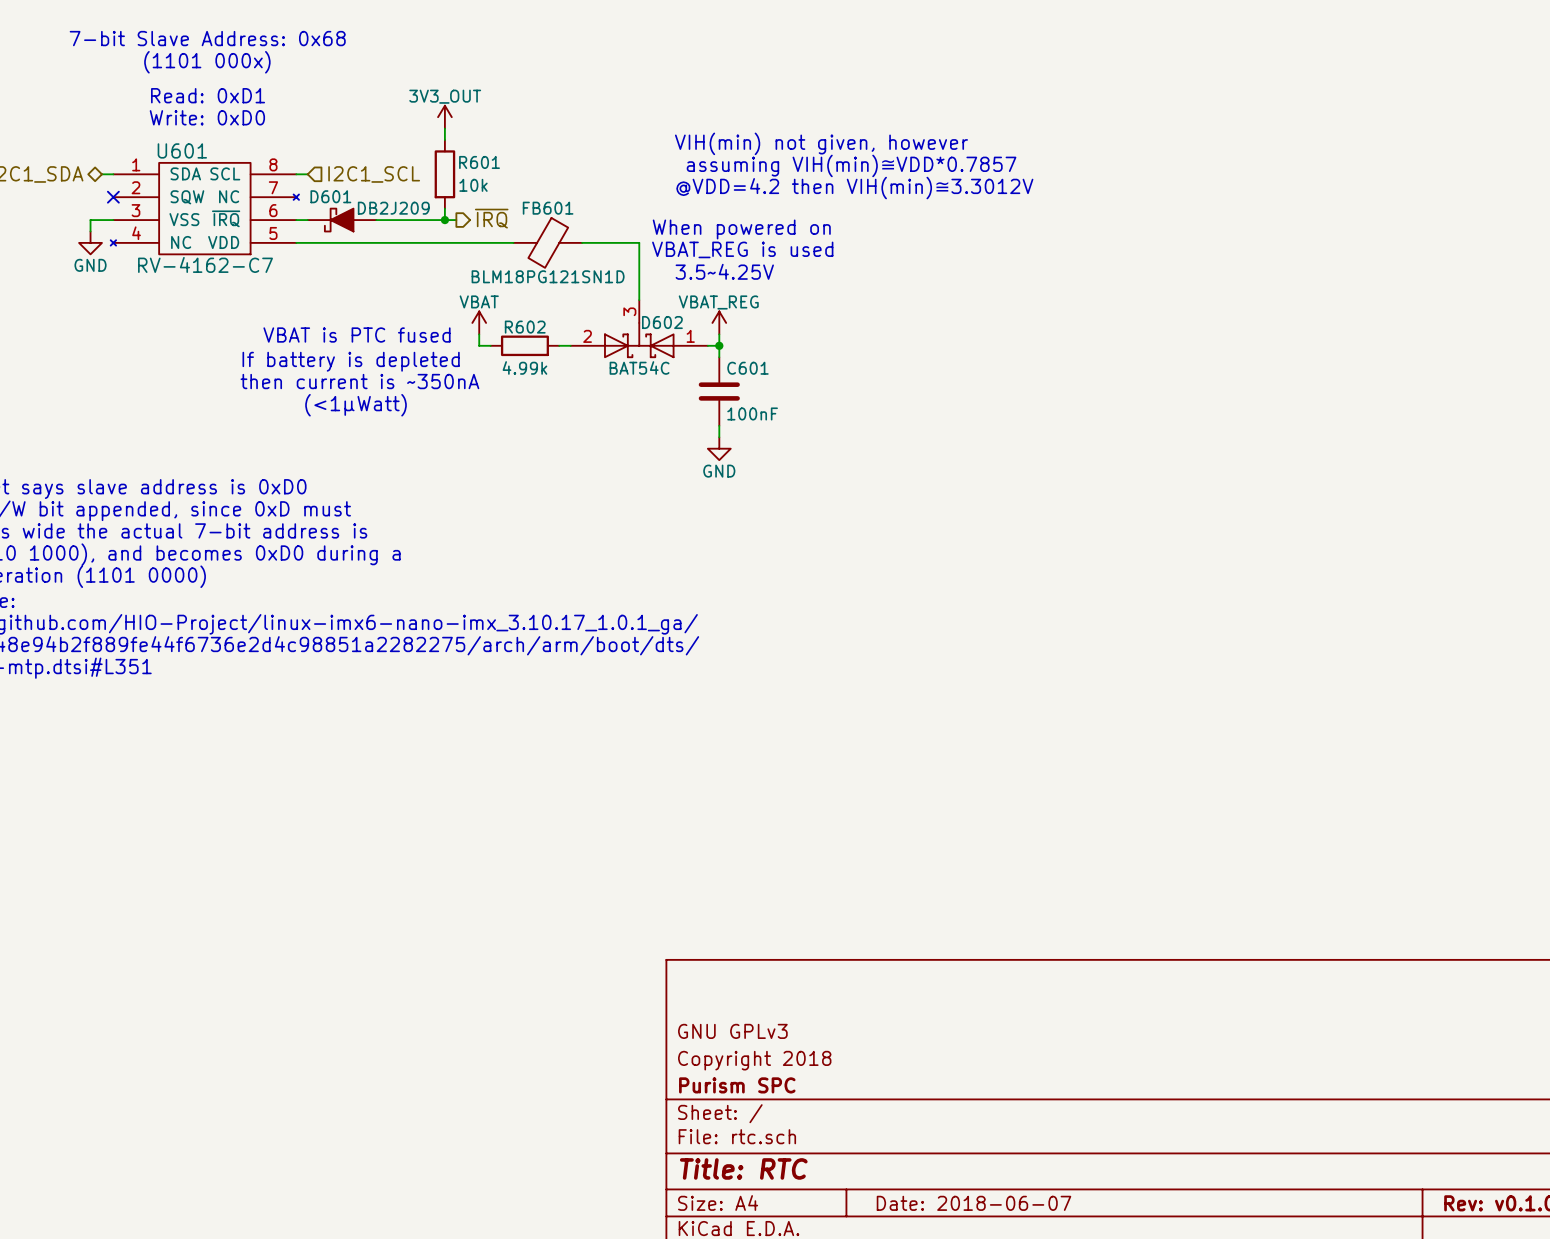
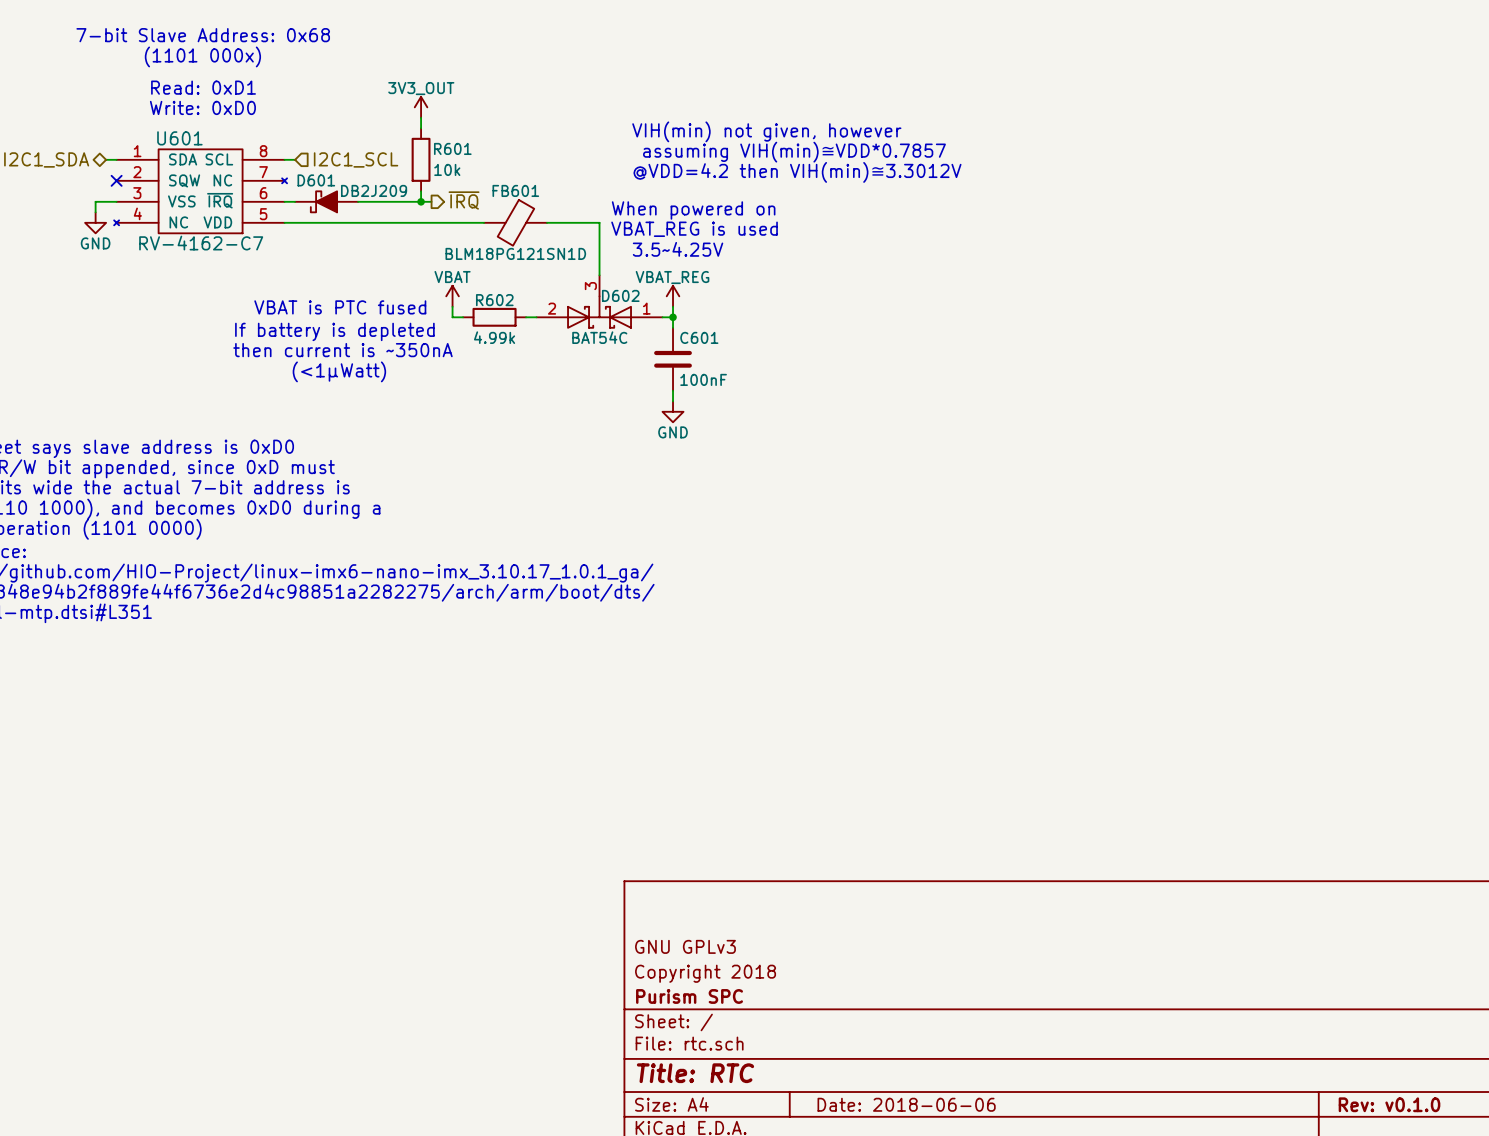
title block: Date: 2018-06-07 (974, 1203) -> Date: 2018-06-06 (906, 1104)

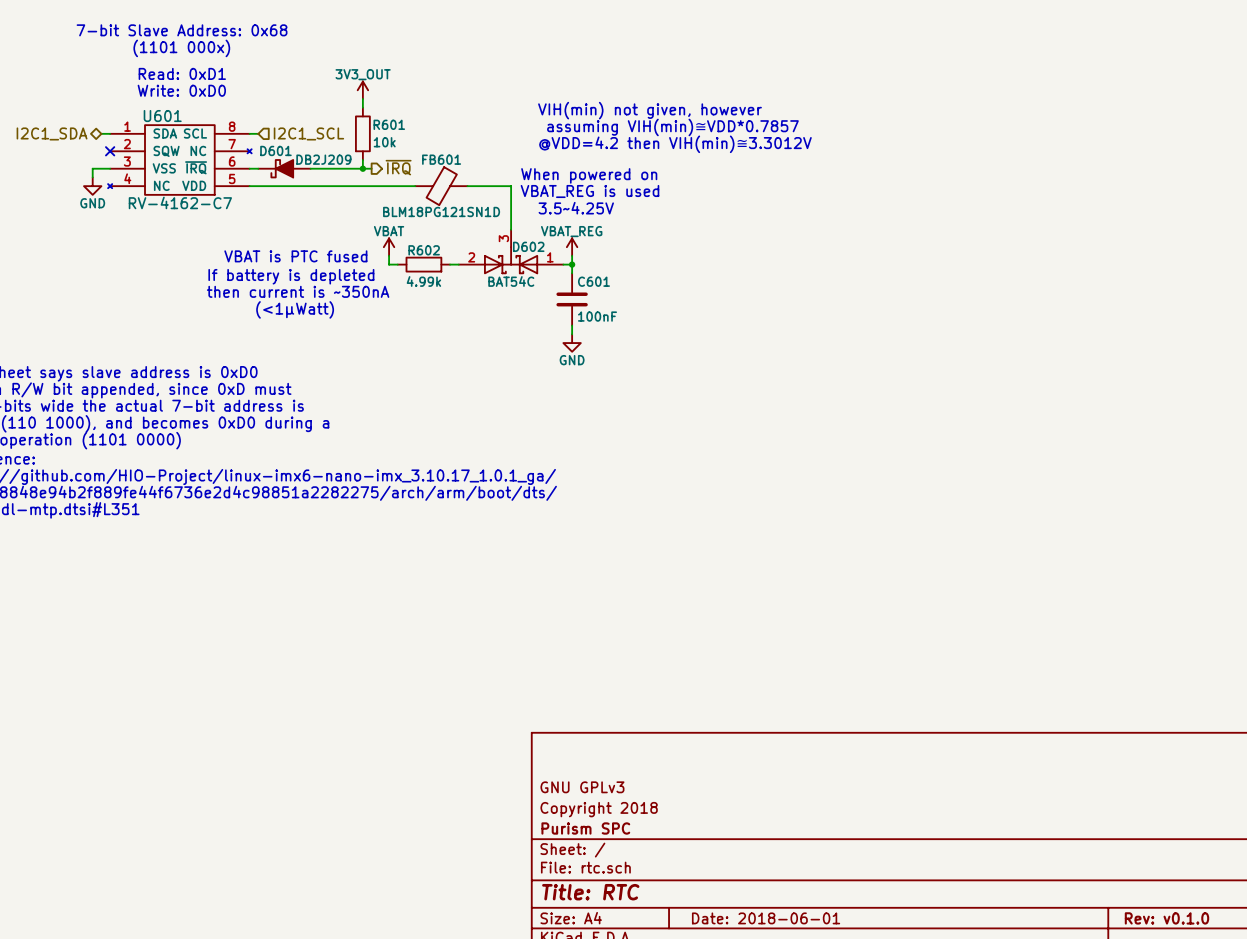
title block: Date: 2018-06-06 (906, 1104) -> Date: 2018-06-01 (766, 918)

